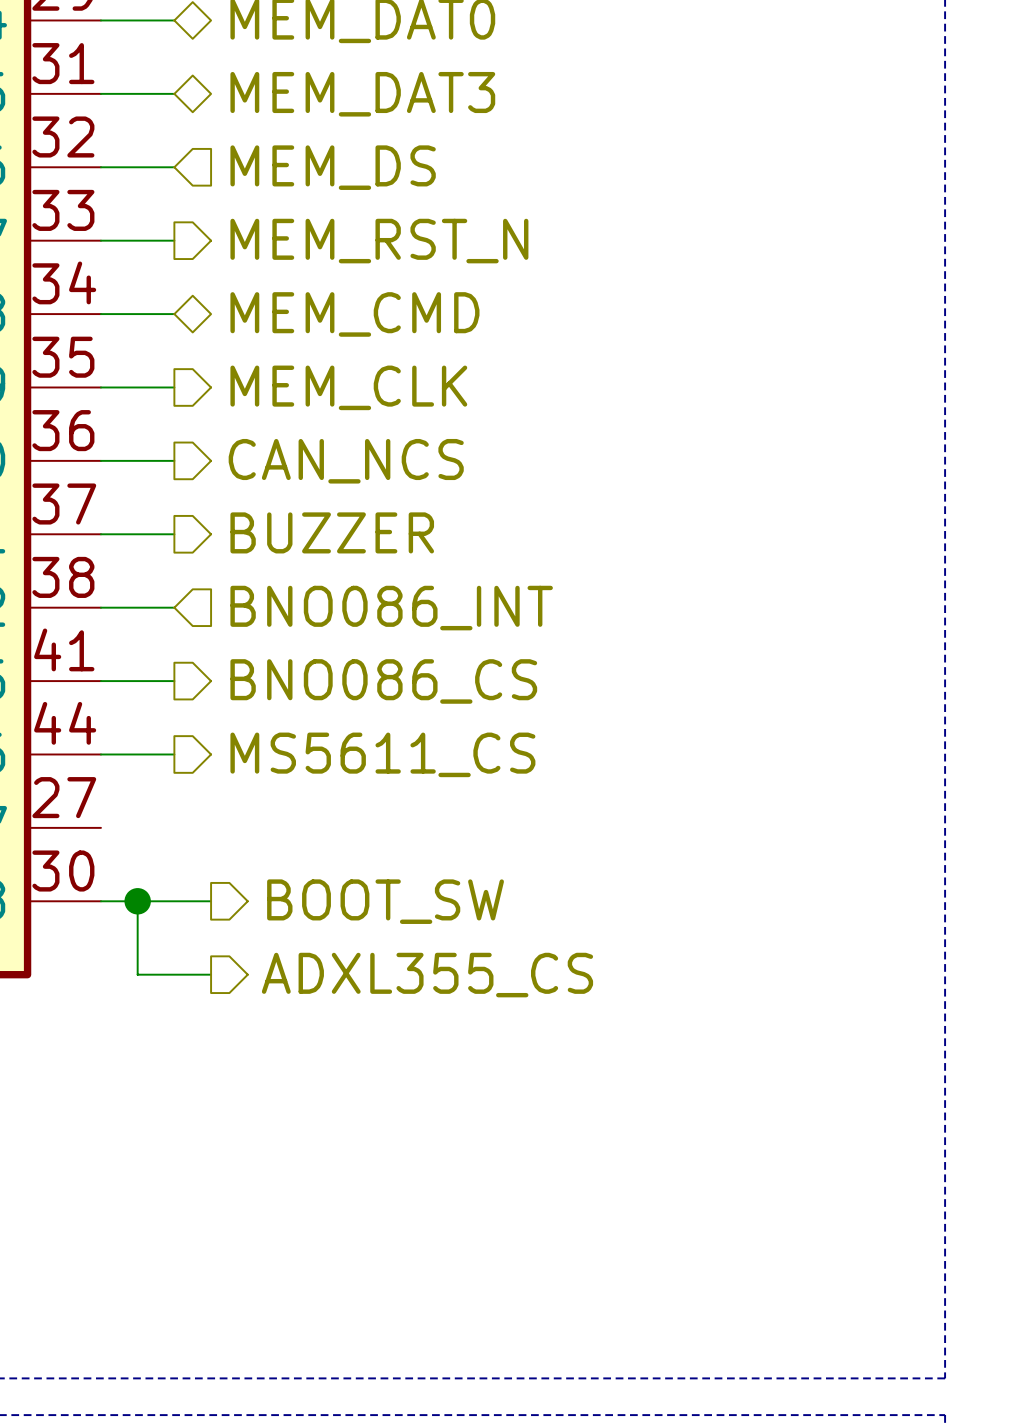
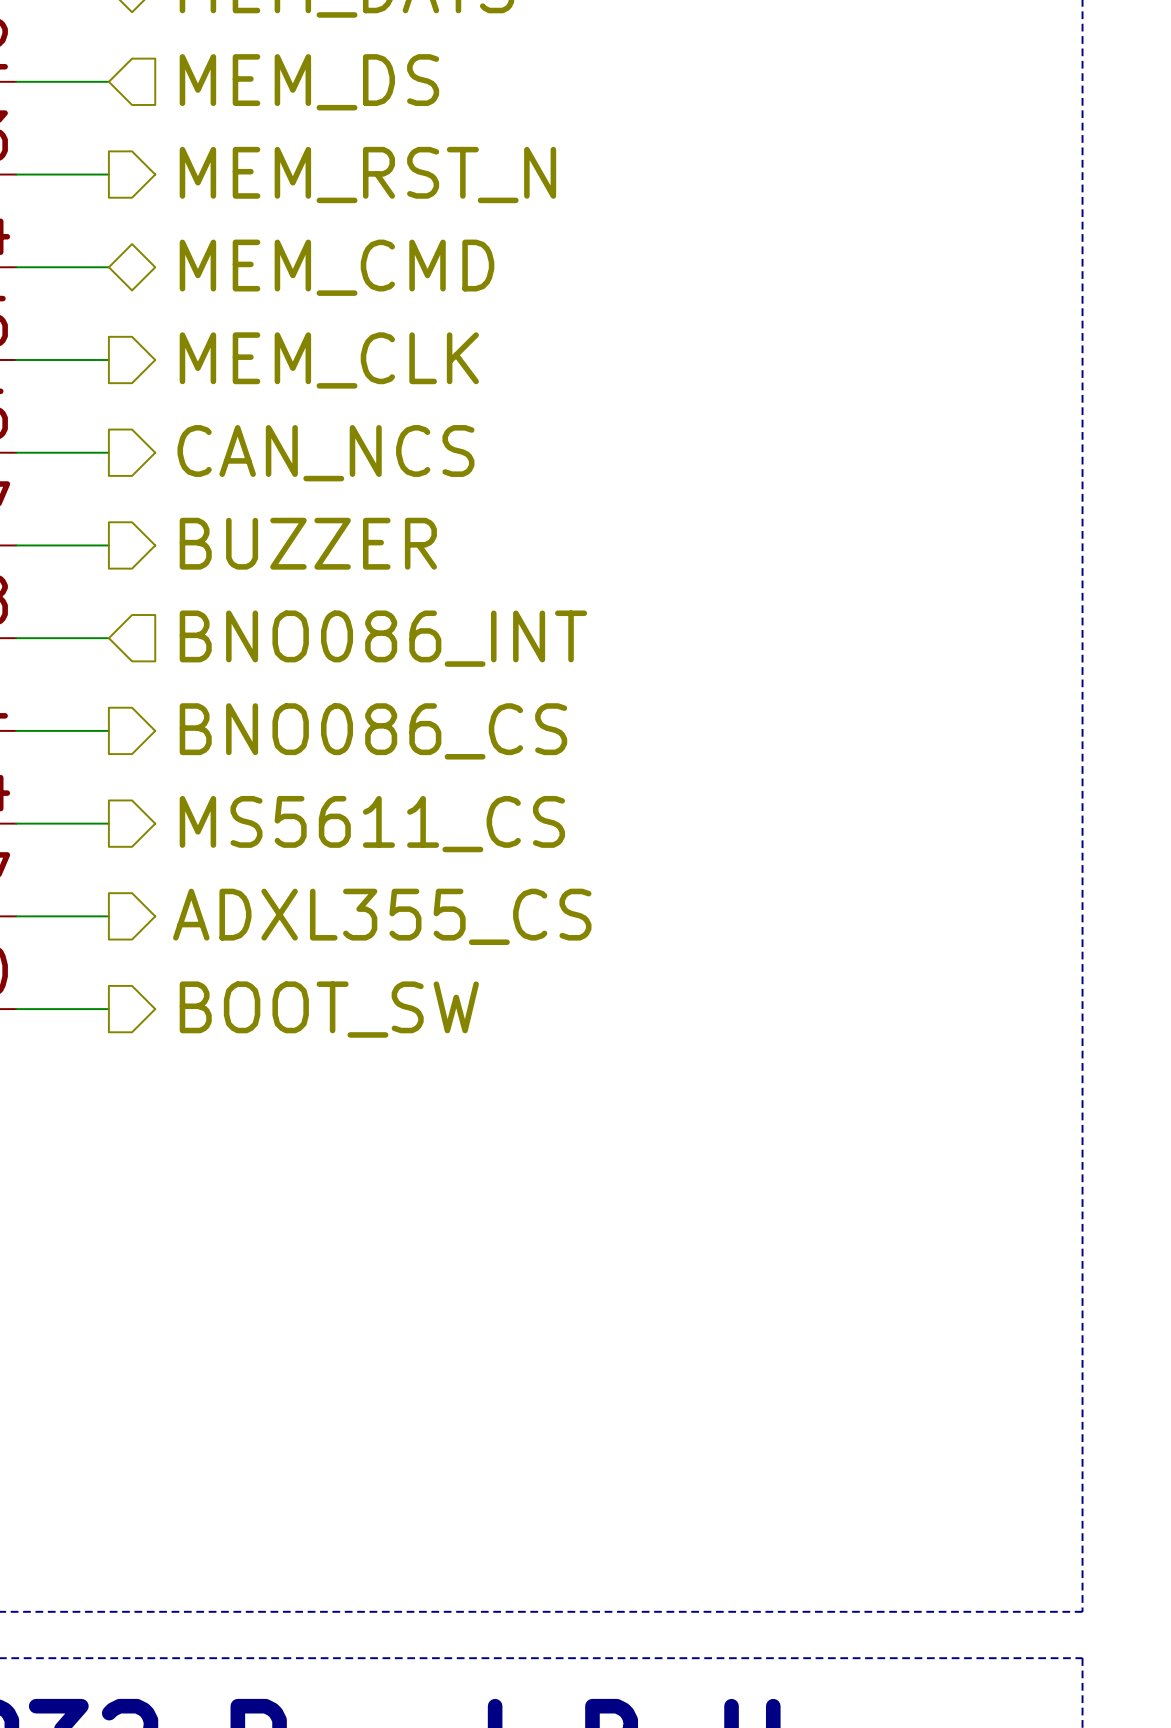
wire: none -> (16, 916) (108, 916)
wire: (137, 901) (137, 974) (211, 974) -> none
junction: (137, 901) -> none
wire: (174, 901) (211, 901) -> none
hierarchical label position: BOOT_SW (385, 901) -> BOOT_SW (329, 1009)
hierarchical label position: ADXL355_CS (427, 975) -> ADXL355_CS (382, 916)

